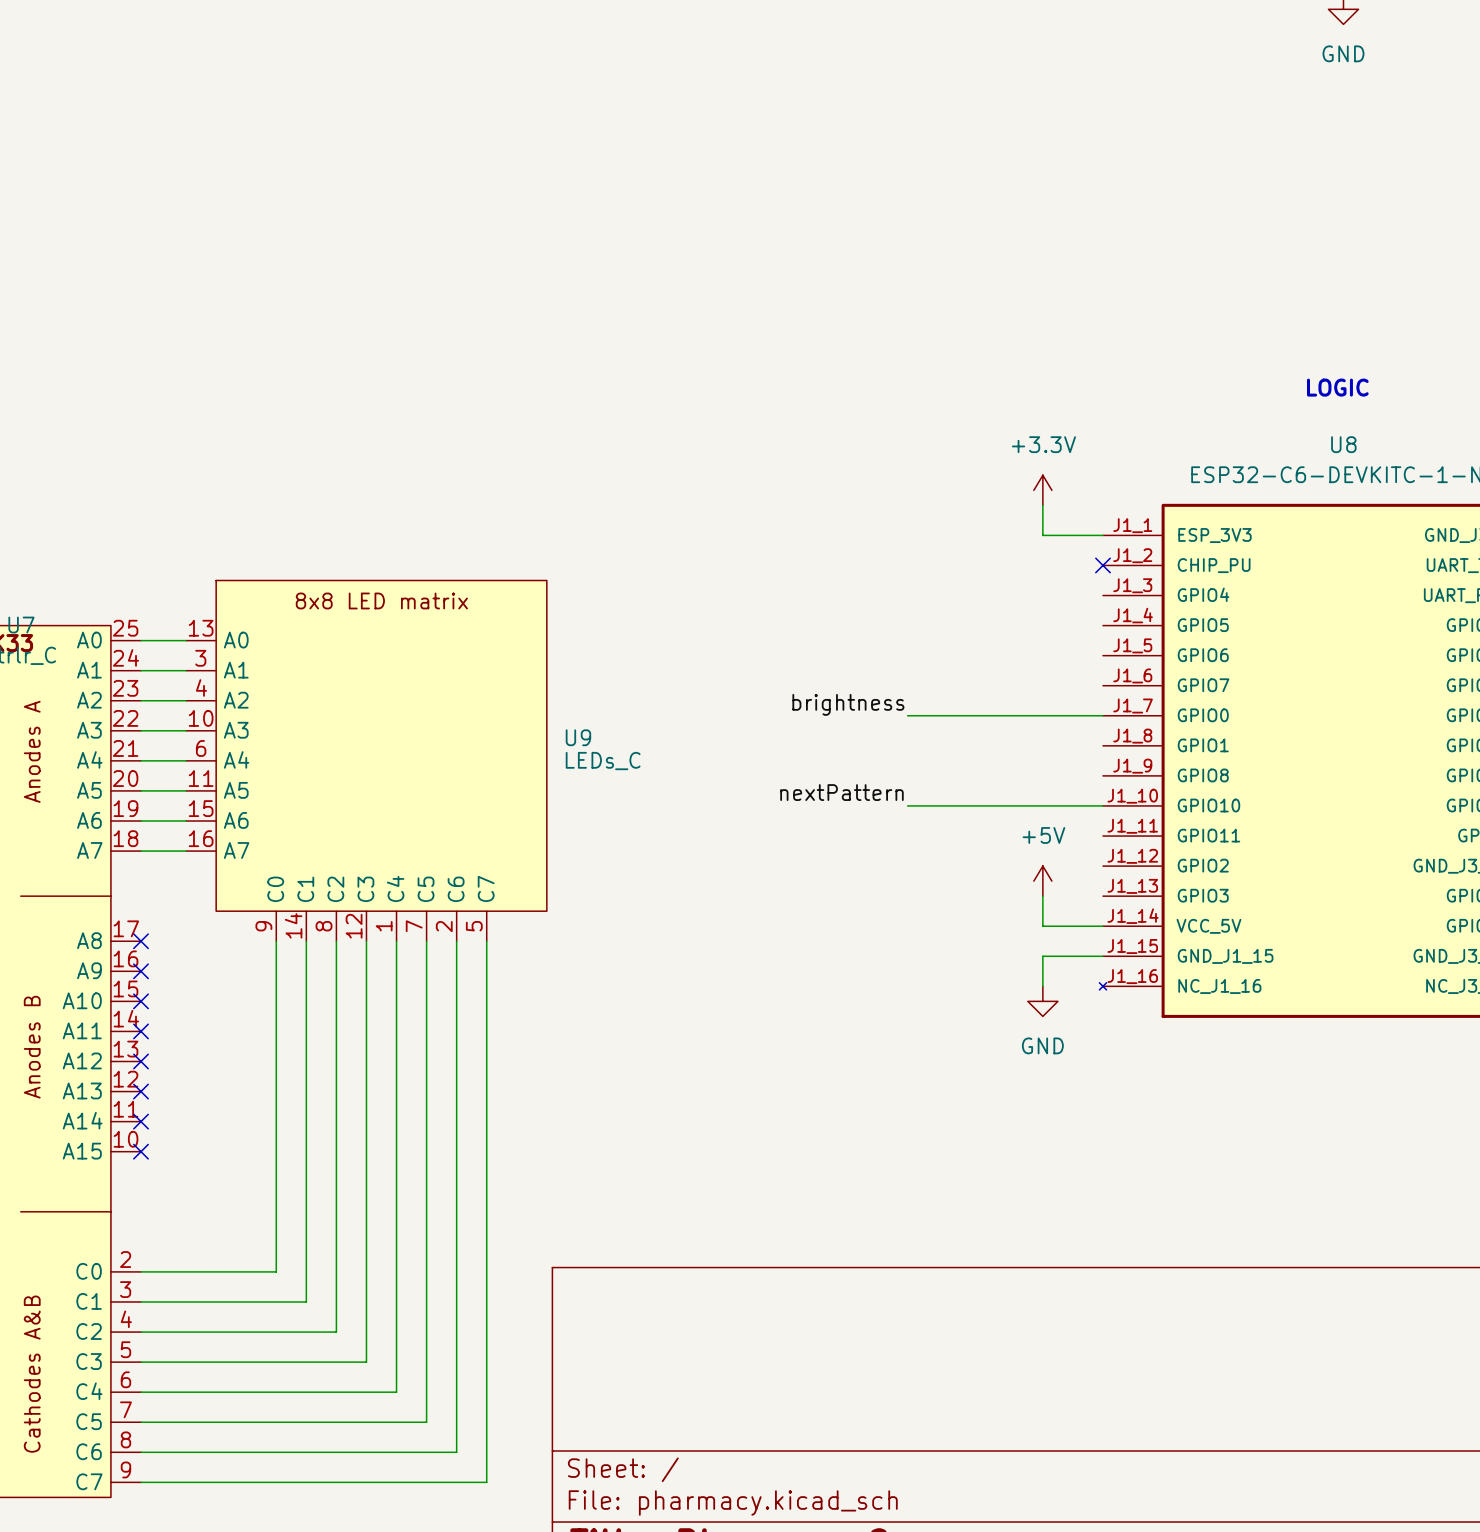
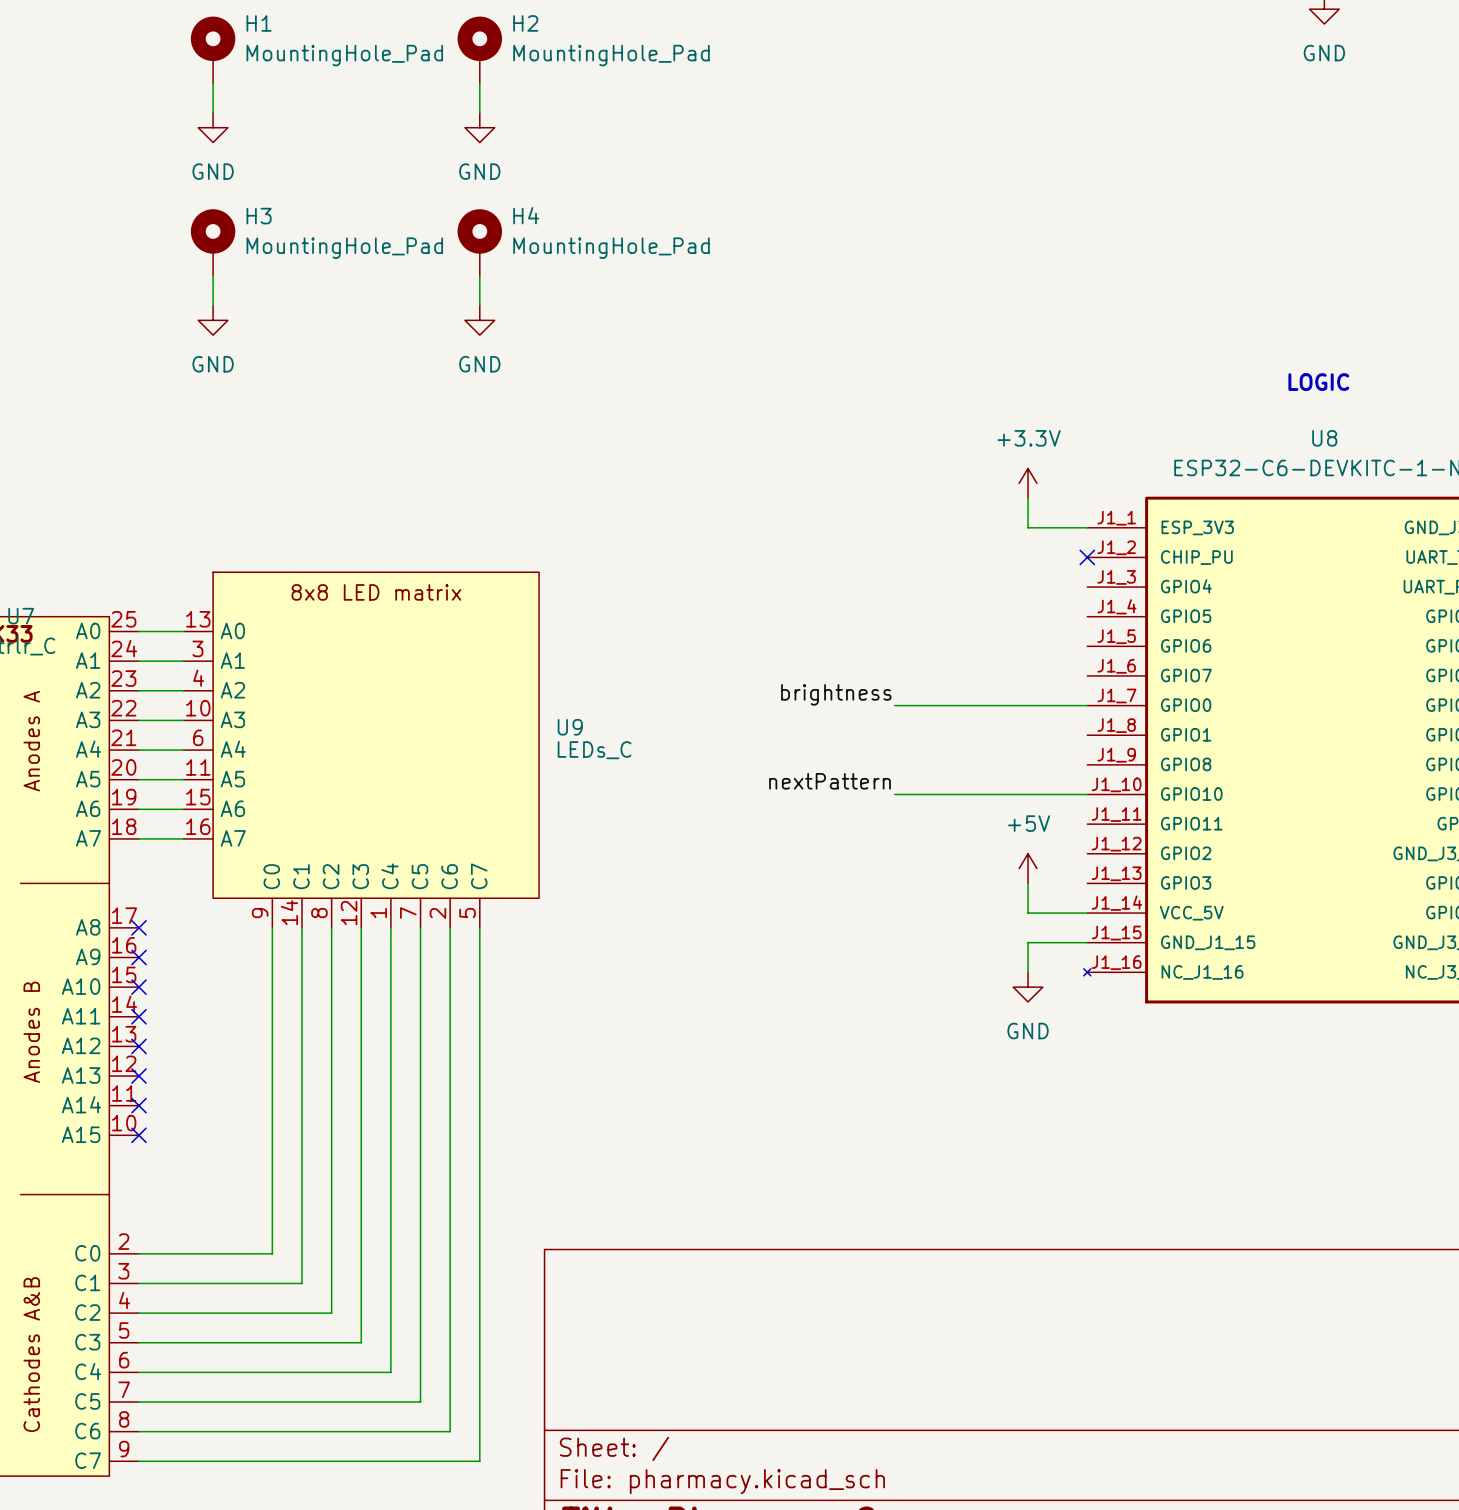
H1: none -> MountingHole_Pad (213, 49)
H2: none -> MountingHole_Pad (479, 49)
wire: none -> (213, 83) (213, 112)
wire: none -> (479, 83) (479, 112)
power symbol: none -> GND (213, 127)
power symbol: none -> GND (479, 127)
H3: none -> MountingHole_Pad (213, 242)
H4: none -> MountingHole_Pad (479, 242)
wire: none -> (213, 275) (213, 305)
wire: none -> (479, 275) (479, 305)
power symbol: none -> GND (213, 320)
power symbol: none -> GND (479, 320)

